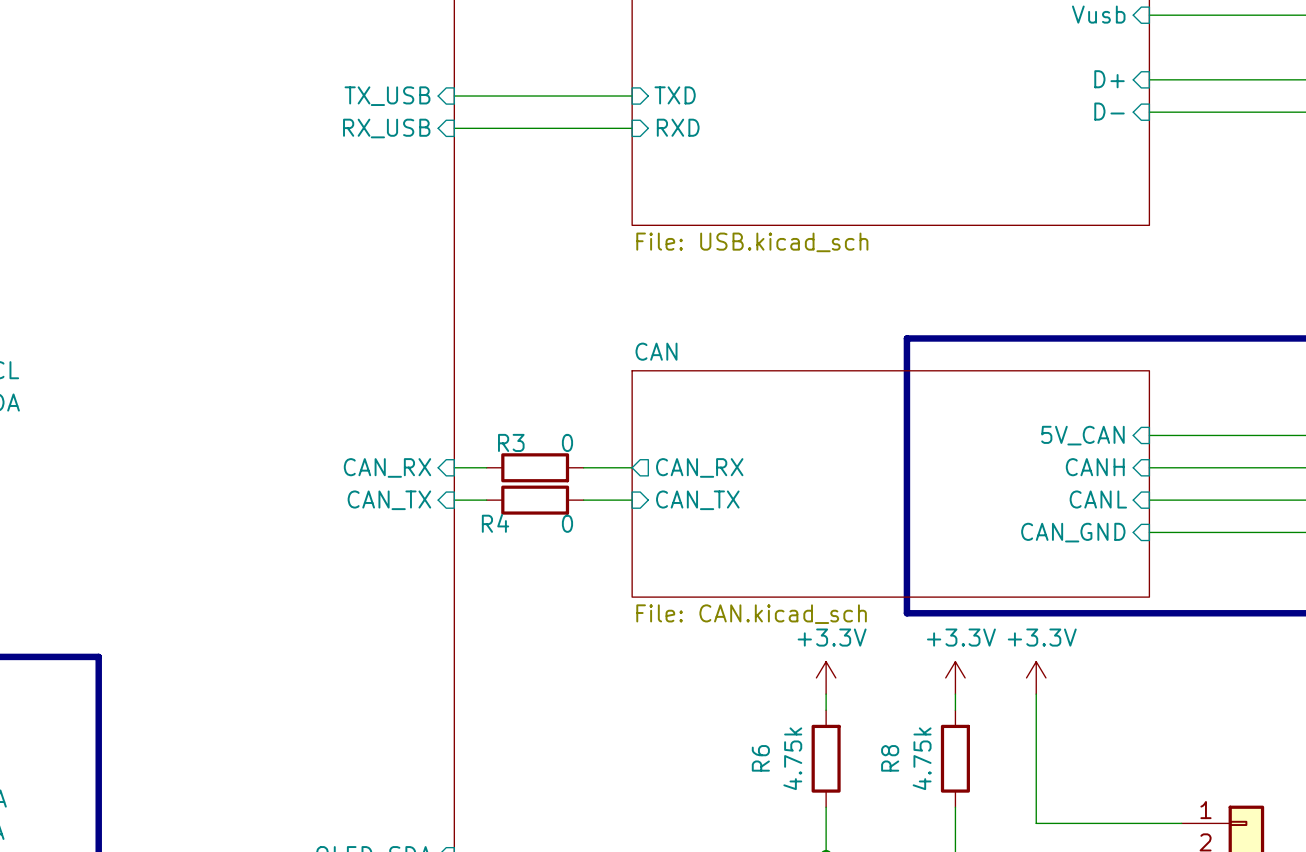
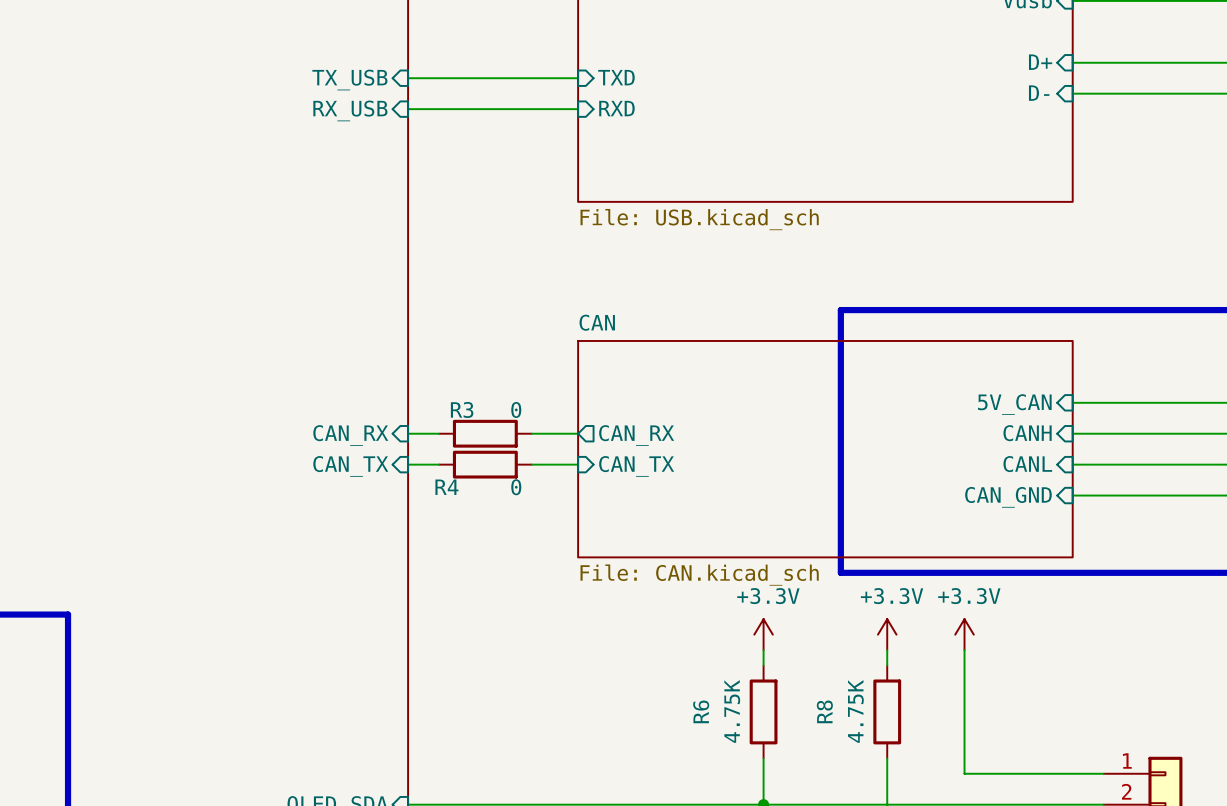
R6 value: 4.75k (792, 758) -> 4.75K (732, 711)
R8 value: 4.75k (922, 758) -> 4.75K (855, 711)

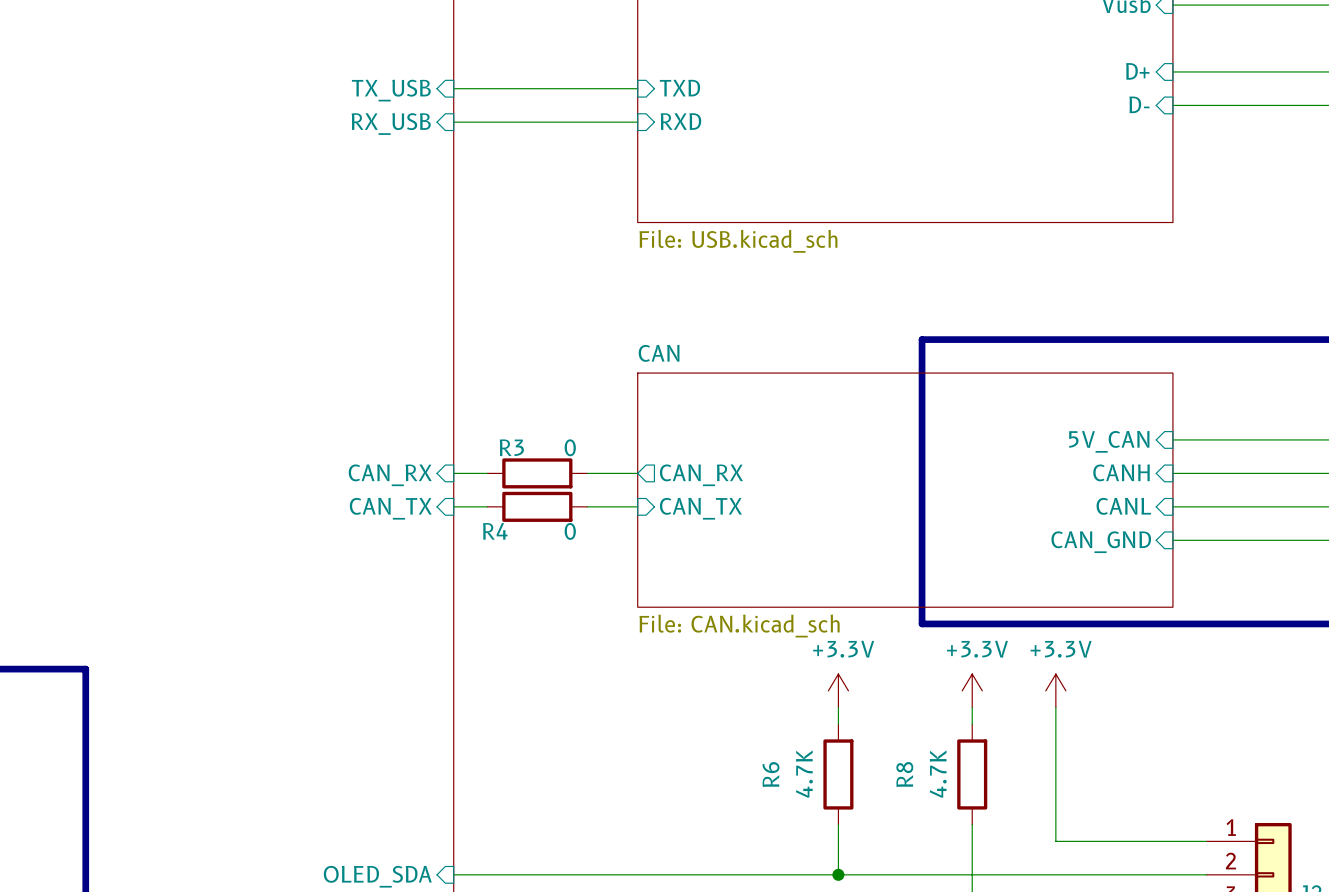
R6 value: 4.75K (732, 711) -> 4.7K (804, 773)
R8 value: 4.75K (855, 711) -> 4.7K (938, 773)

